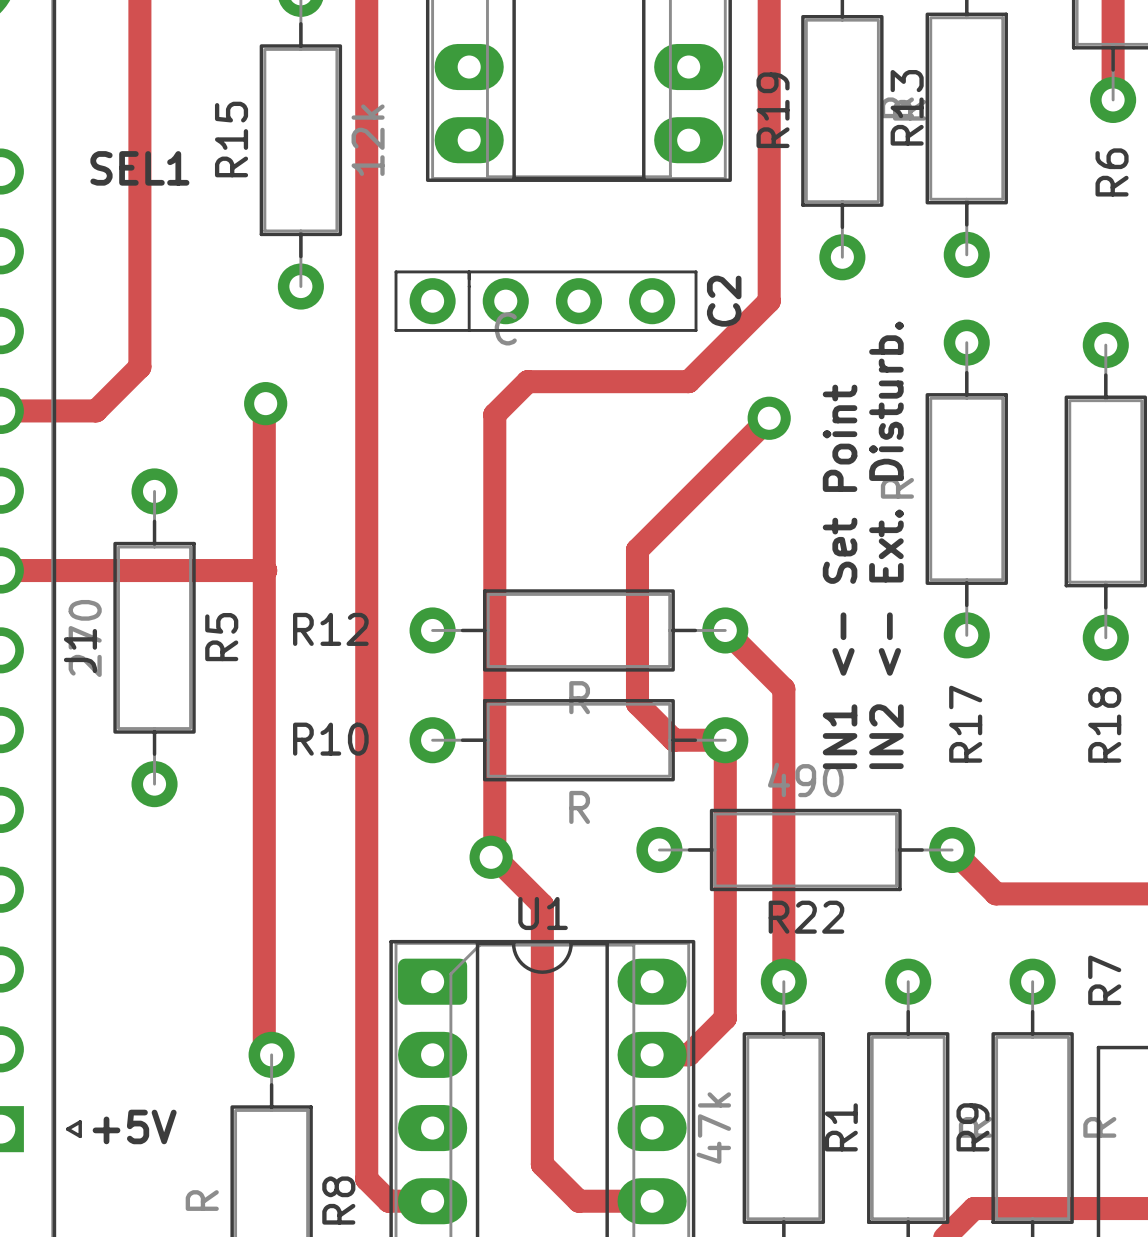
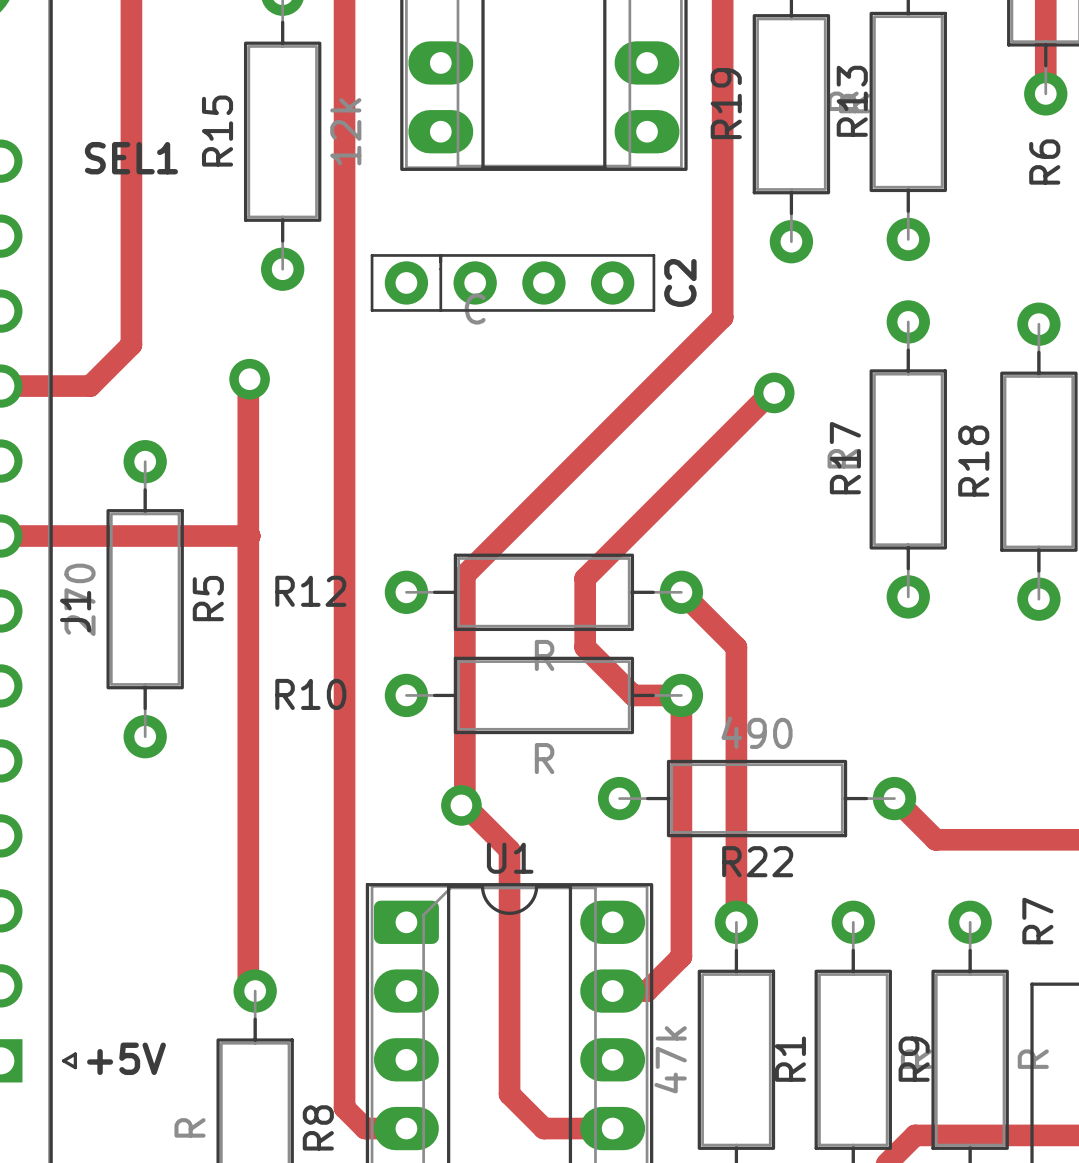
track: (769, 301) (688, 381) (527, 381) (494, 414) (494, 612) -> (722, 282) (722, 317) (464, 575)
track: (769, 418) (637, 549) (637, 703) -> (774, 392) (770, 392) (585, 578) (585, 647) (598, 661)
via position: (769, 418) -> (774, 392)
text: IN2 <- Ext. Disturb. (886, 545) -> none
text: IN1 <- Set Point (840, 576) -> none
R17 name position: R17 (965, 724) -> R17 (845, 458)
R18 name position: R18 (1104, 724) -> R18 (973, 461)

